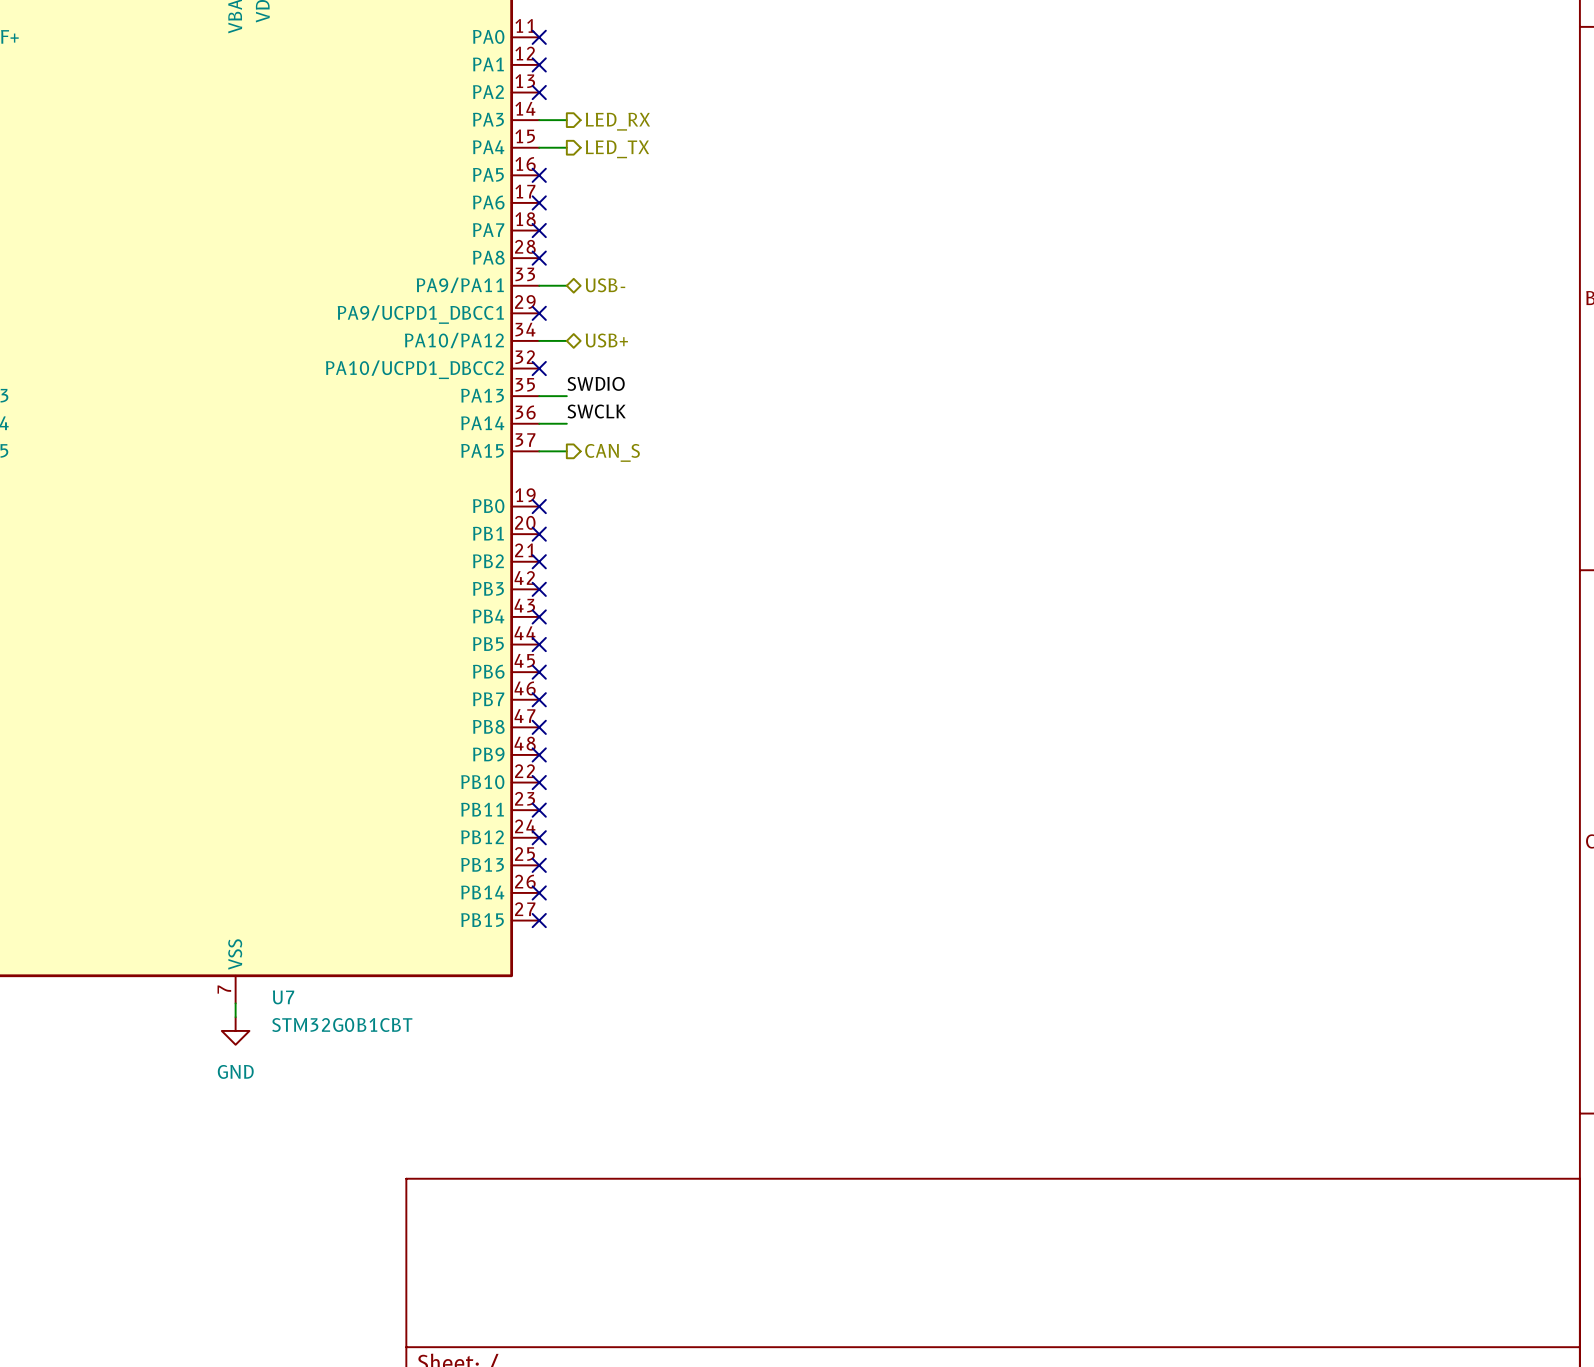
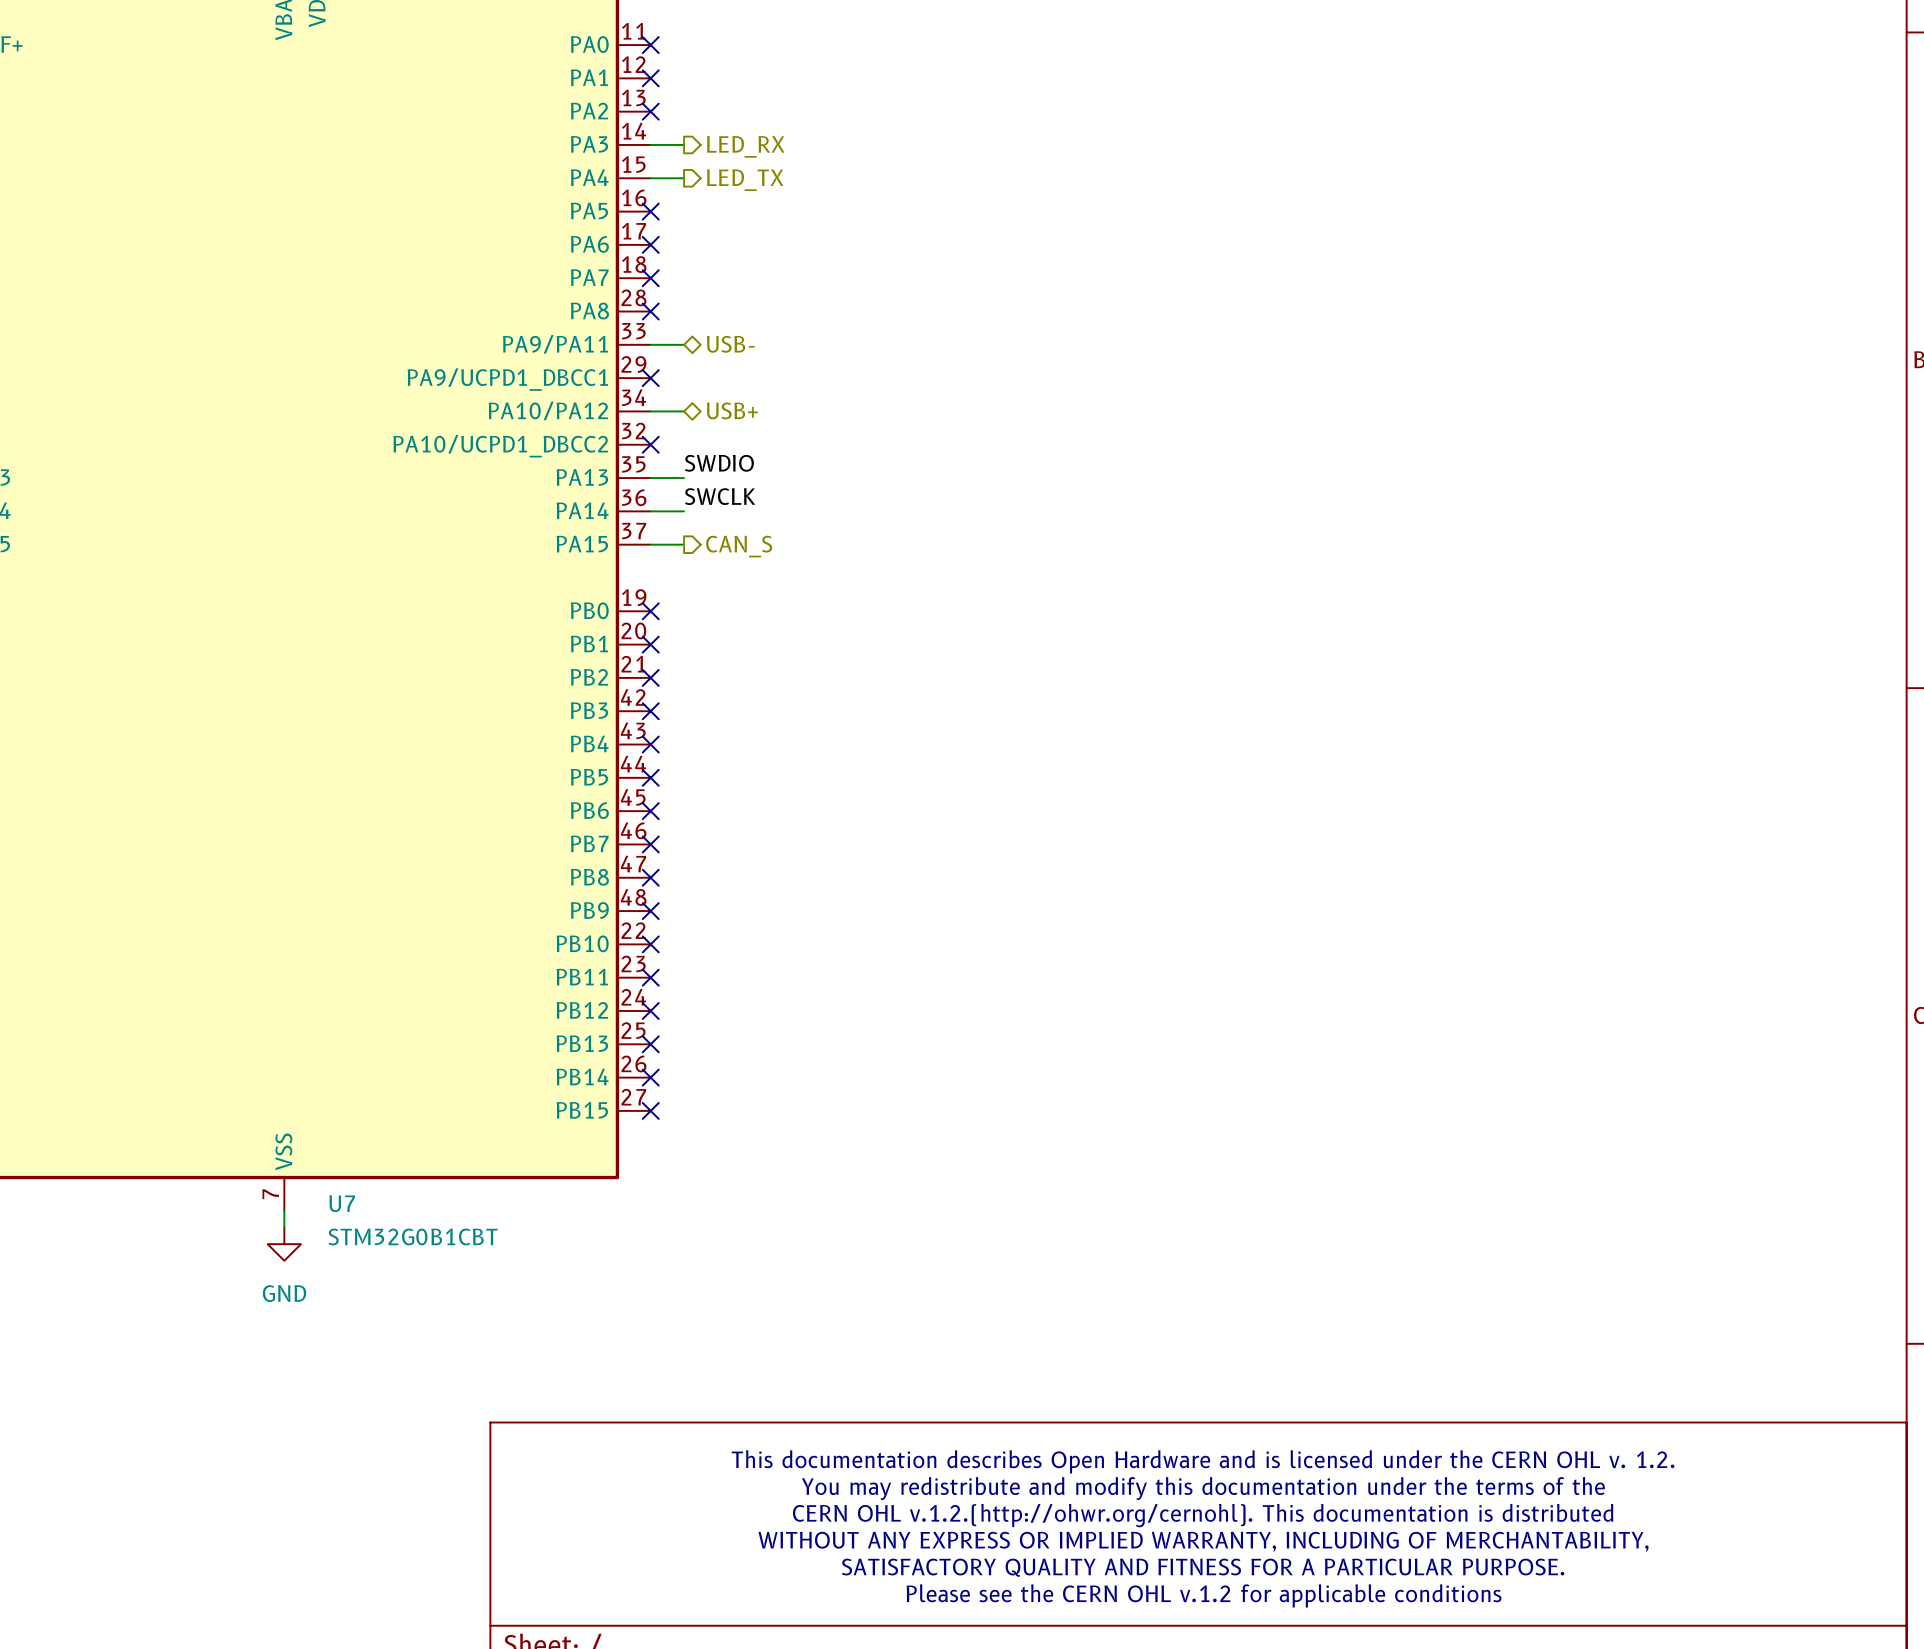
text: none -> This documentation describes Open Hardware and is licensed under the CERN OHL v. 1.2. (1203, 1461)
text: none -> You may redistribute and modify this documentation under the terms of the (1203, 1488)
text: none -> CERN OHL v.1.2.(http://ohwr.org/cernohl). This documentation is distributed (1203, 1515)
text: none -> WITHOUT ANY EXPRESS OR IMPLIED WARRANTY, INCLUDING OF MERCHANTABILITY, (1203, 1541)
text: none -> SATISFACTORY QUALITY AND FITNESS FOR A PARTICULAR PURPOSE. (1203, 1567)
text: none -> Please see the CERN OHL v.1.2 for applicable conditions (1203, 1595)

